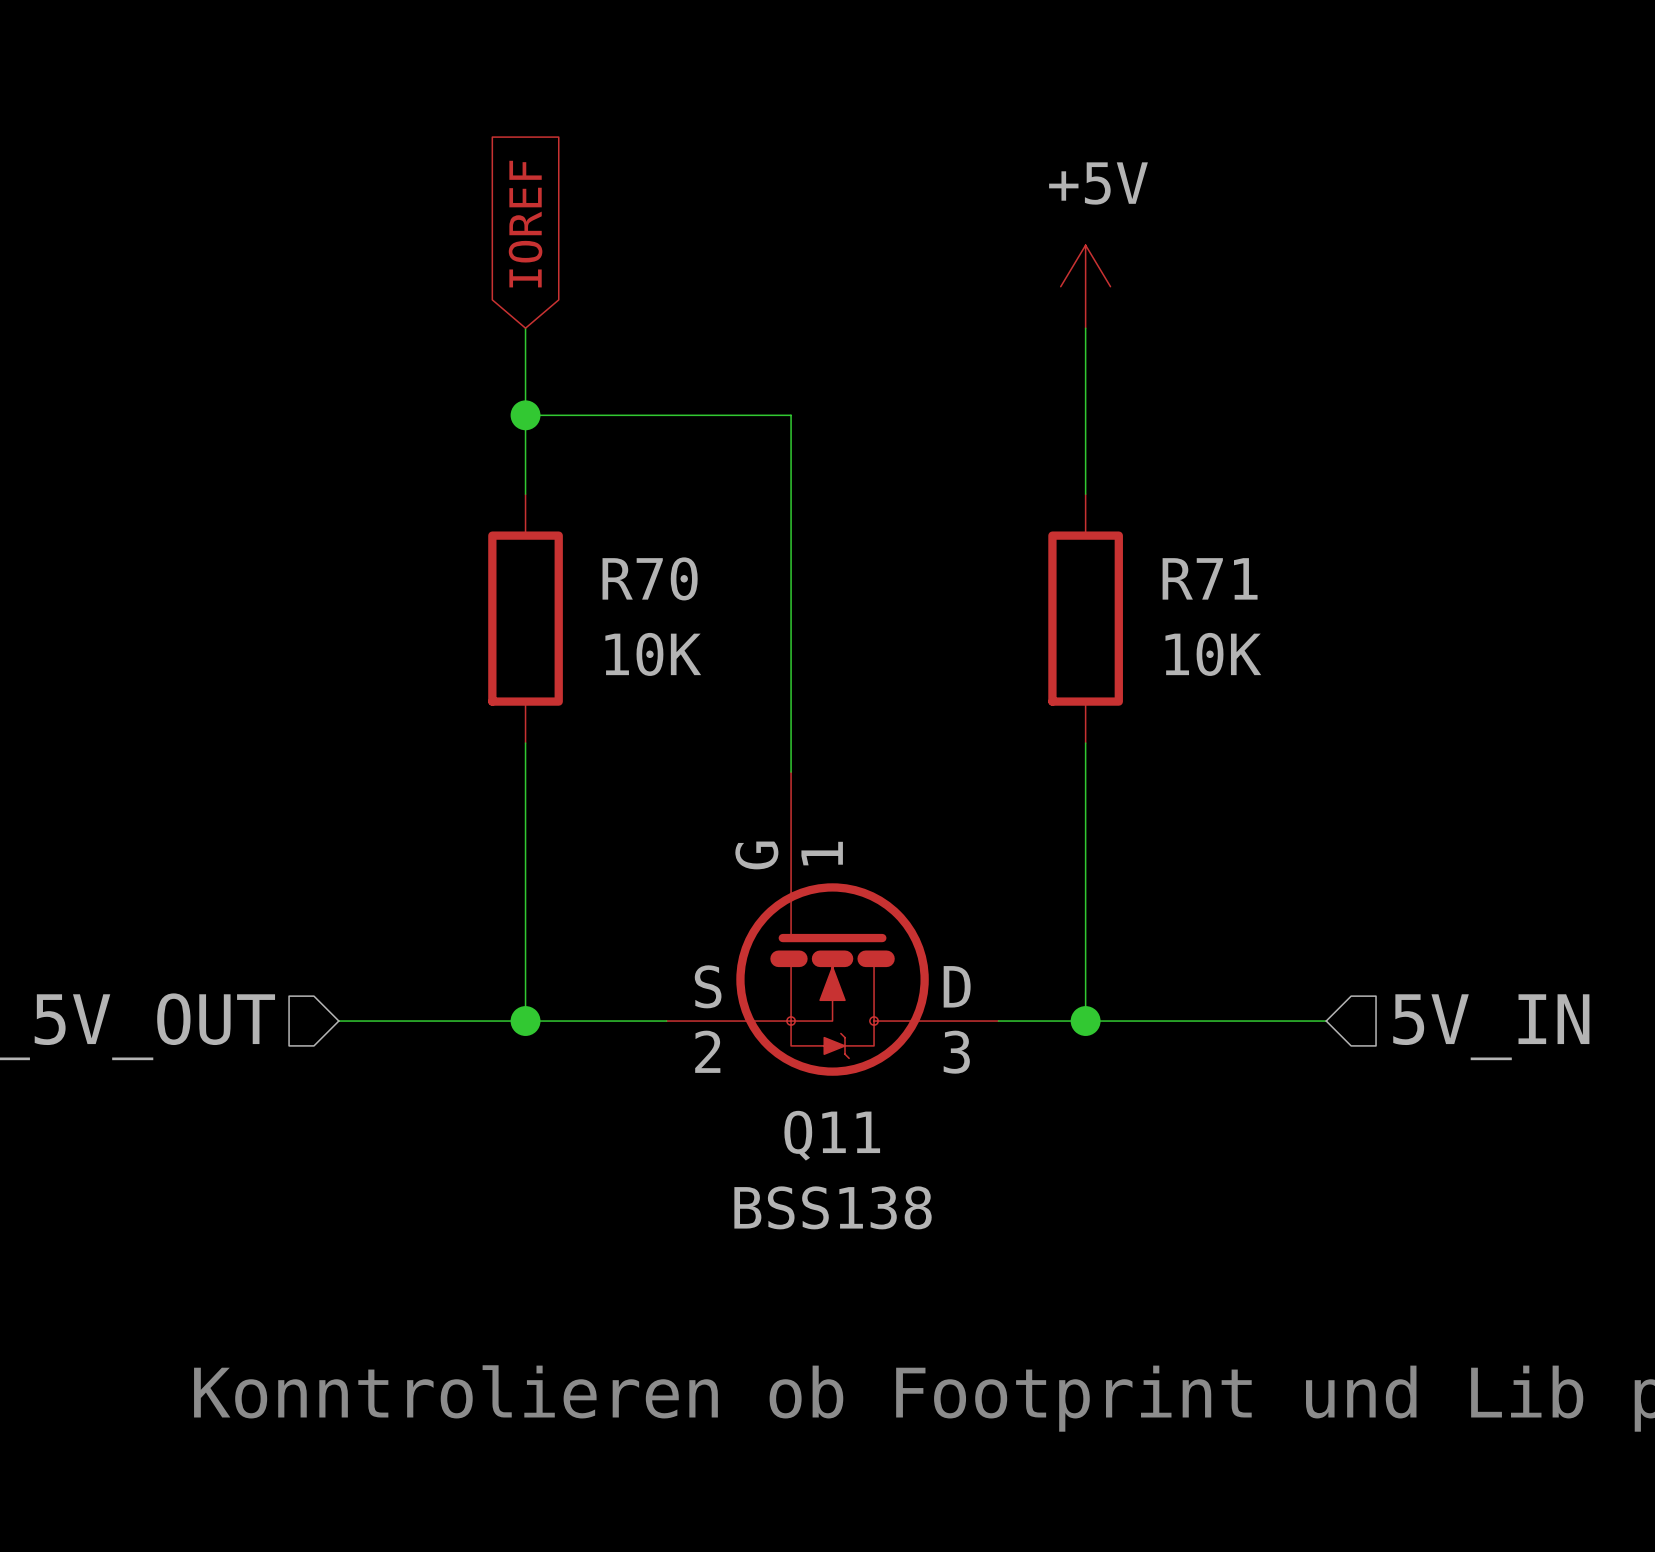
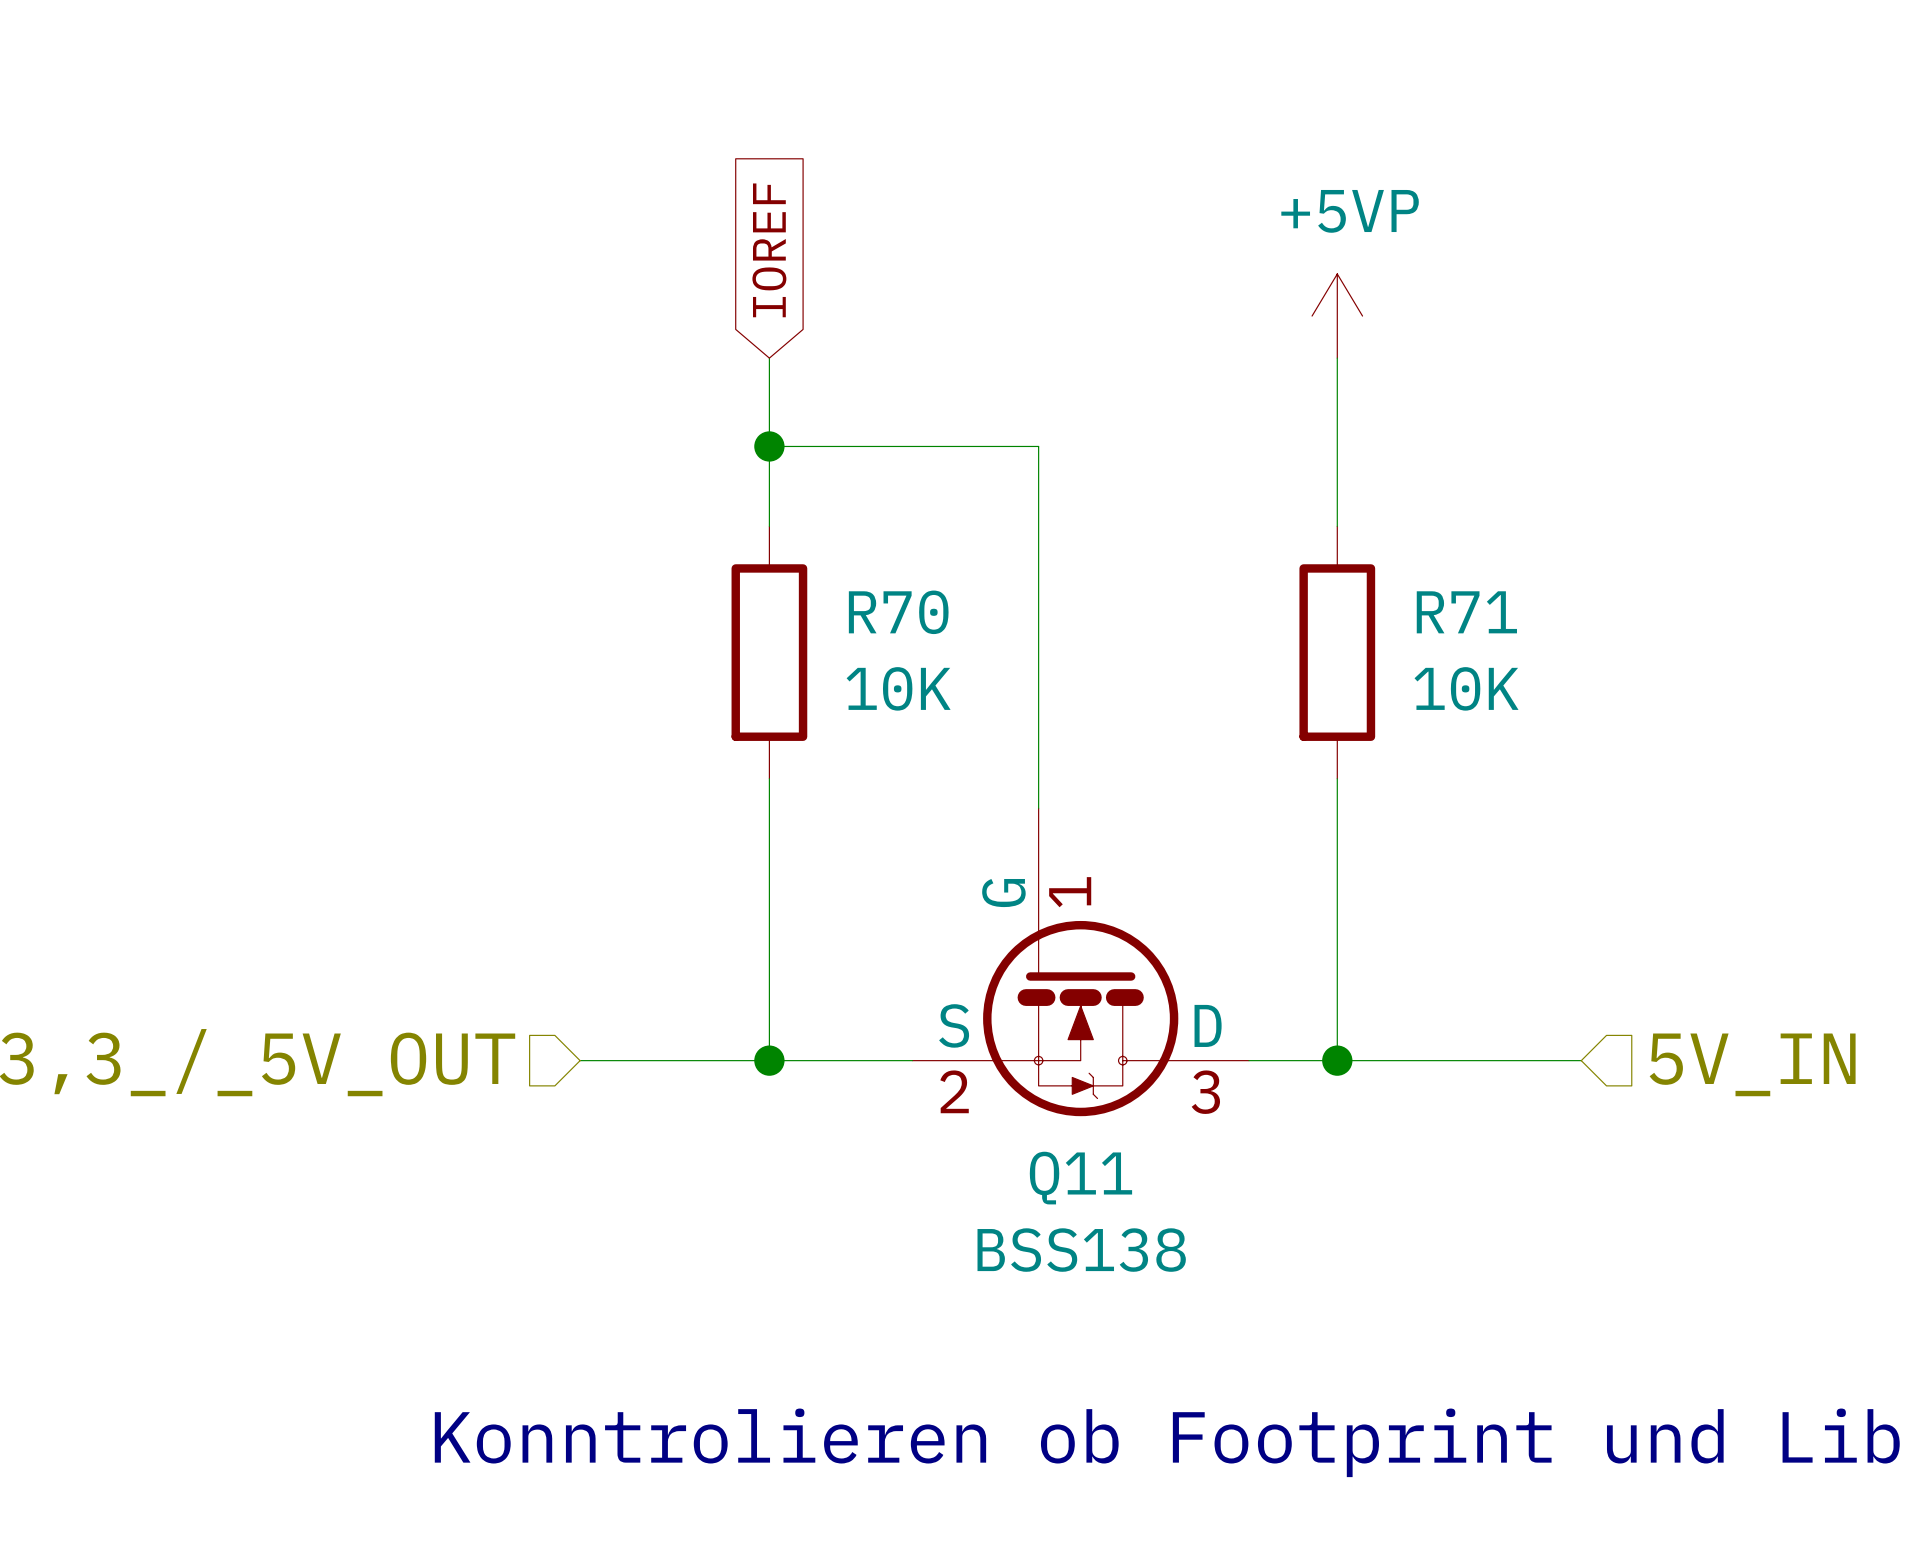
power symbol: +5V (1085, 286) -> +5VP (1337, 316)

